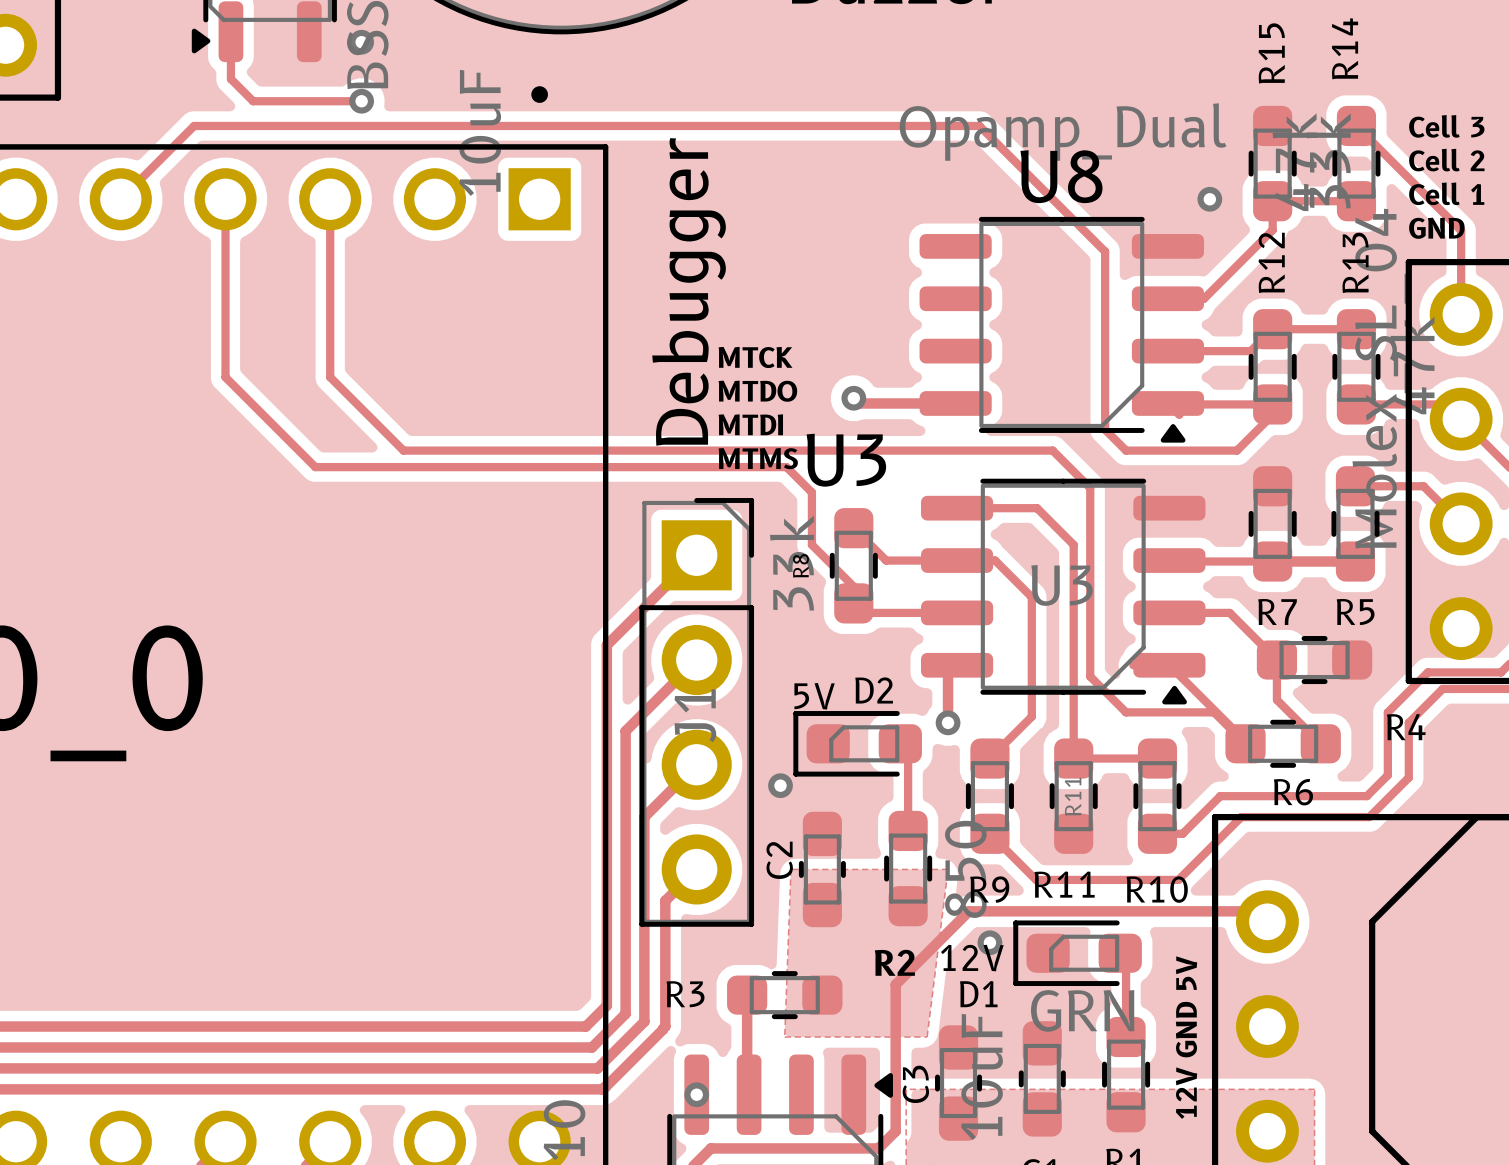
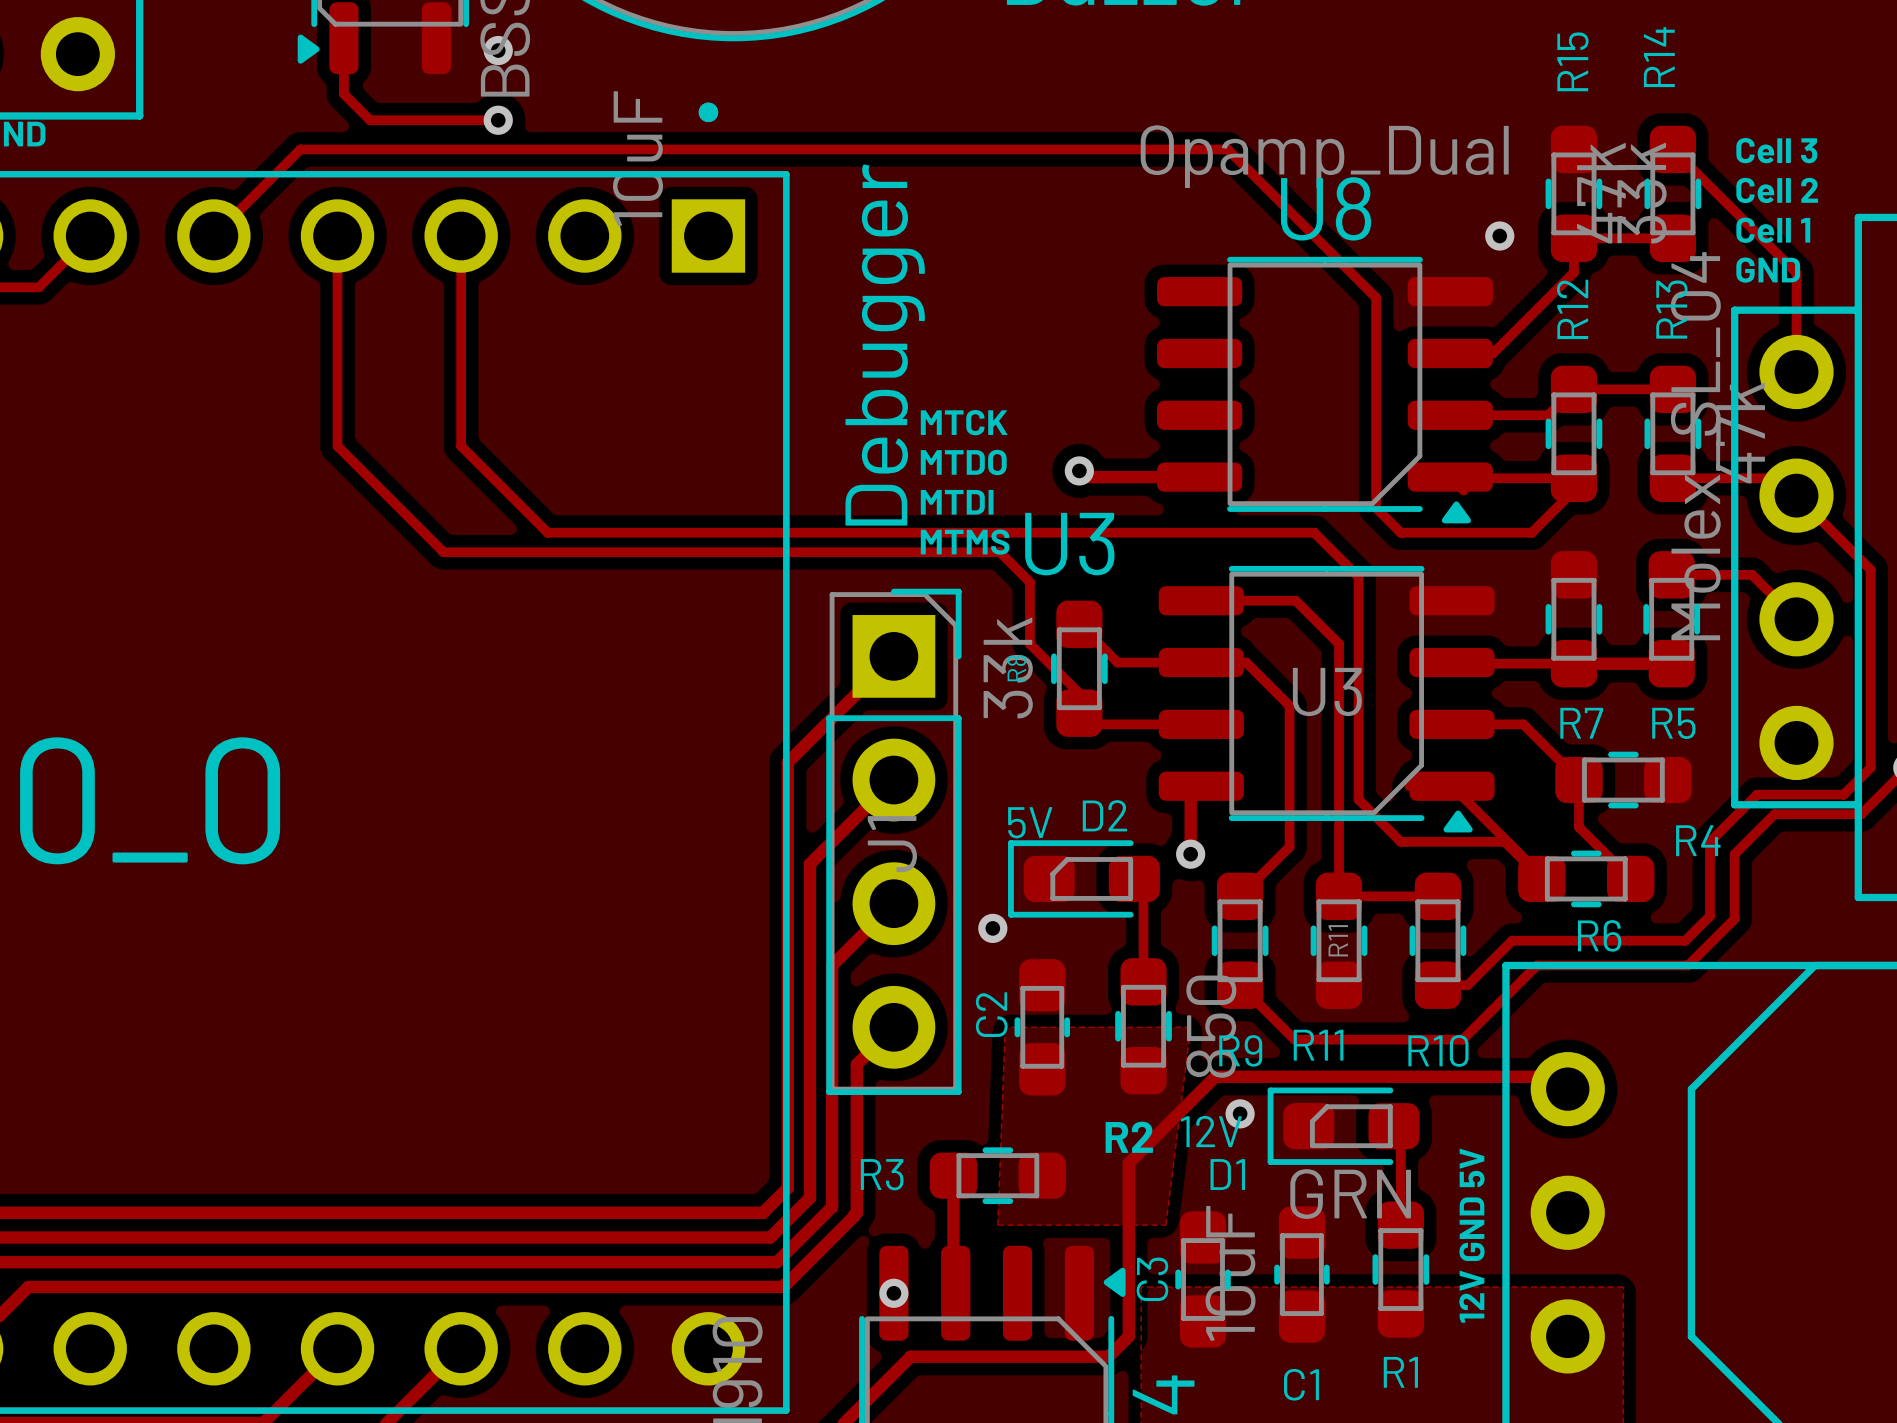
R4 name position: R4 (1406, 727) -> R4 (1698, 840)

